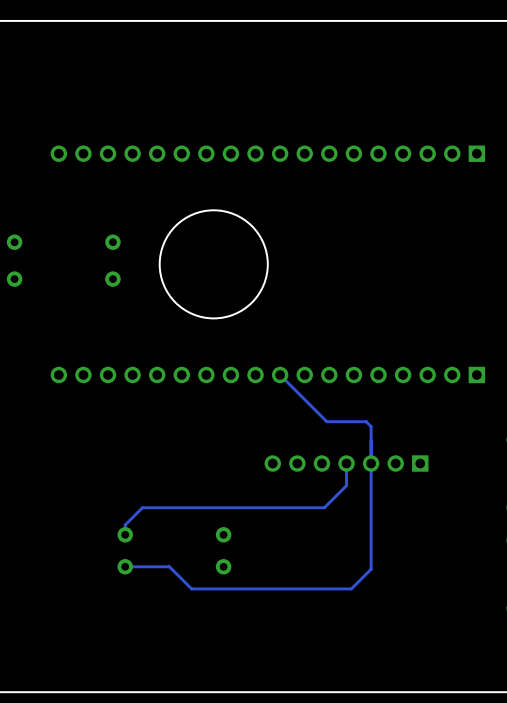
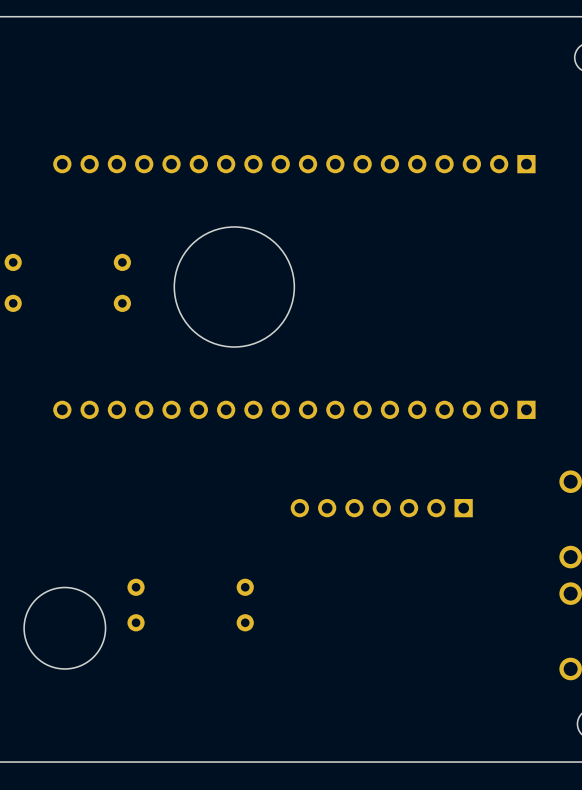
track: (280, 375) (326, 421) (366, 421) (371, 426) (371, 569) (351, 588) (191, 588) (169, 566) (125, 566) -> none
track: (346, 463) (346, 485) (324, 507) (142, 507) (125, 524) (125, 534) -> none
round board edge: none -> [23, 587, 106, 670]

